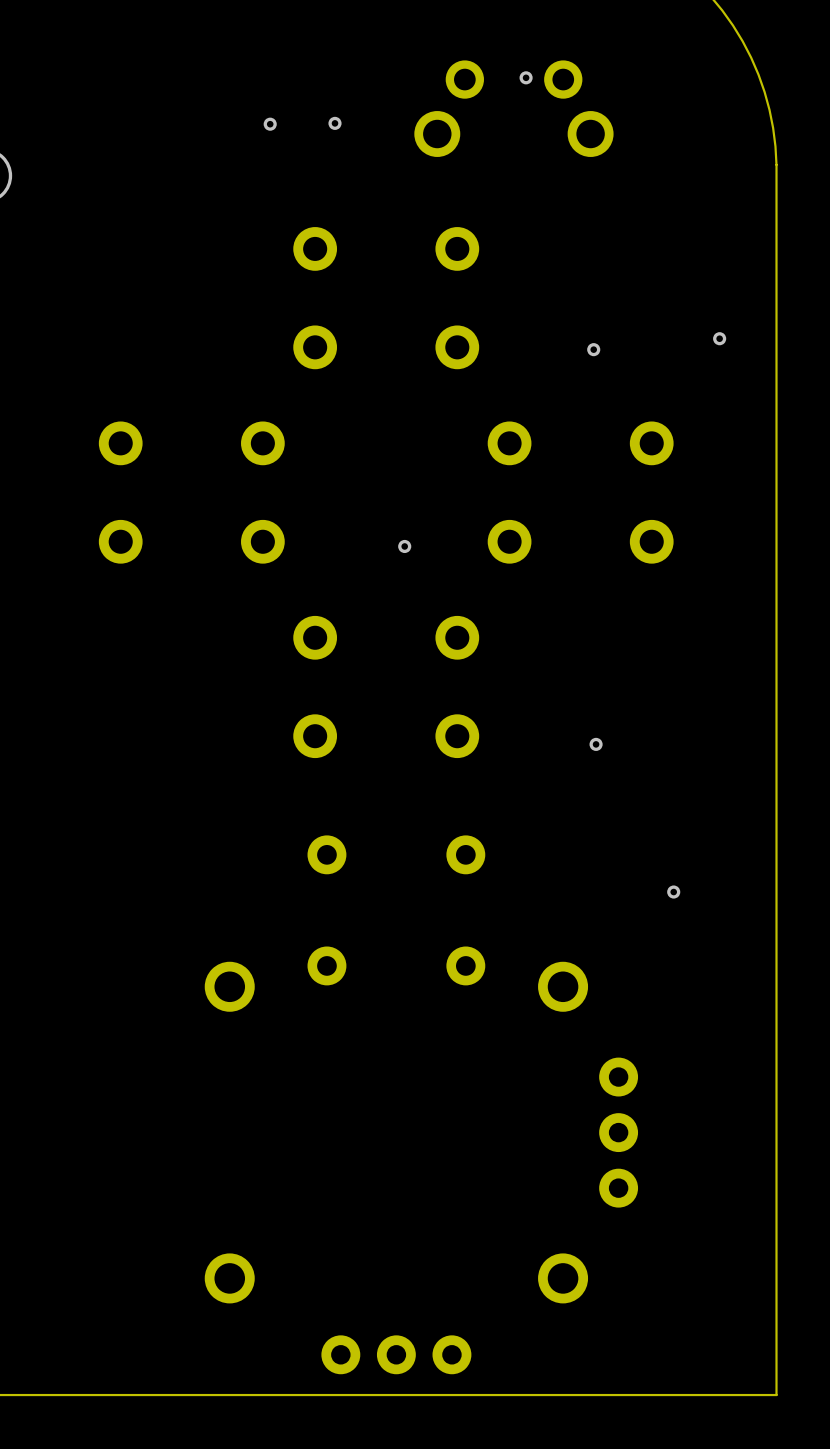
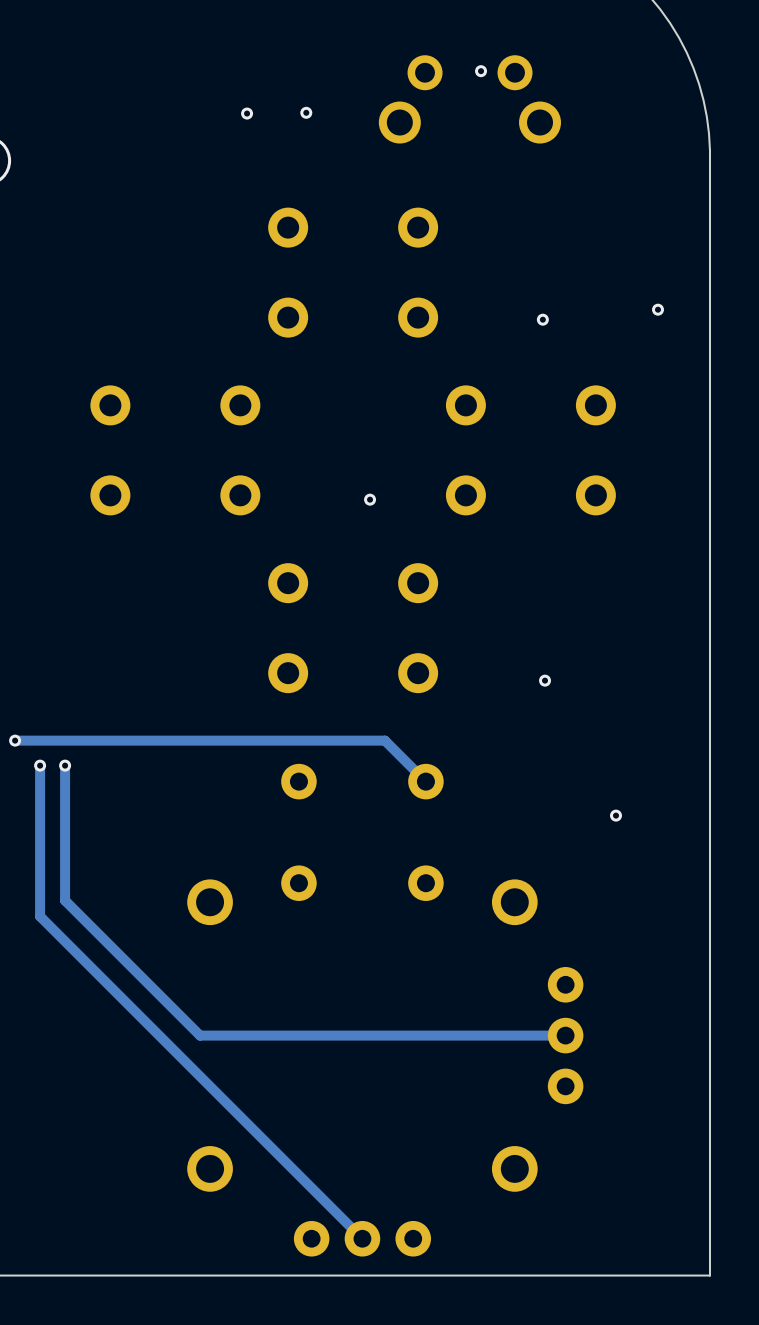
track: none -> (15, 740) (384, 740) (425, 781)
via: none -> (15, 740)
track: none -> (40, 765) (40, 916) (362, 1238)
via: none -> (40, 765)
track: none -> (65, 765) (65, 900) (200, 1035) (565, 1035)
via: none -> (65, 765)

